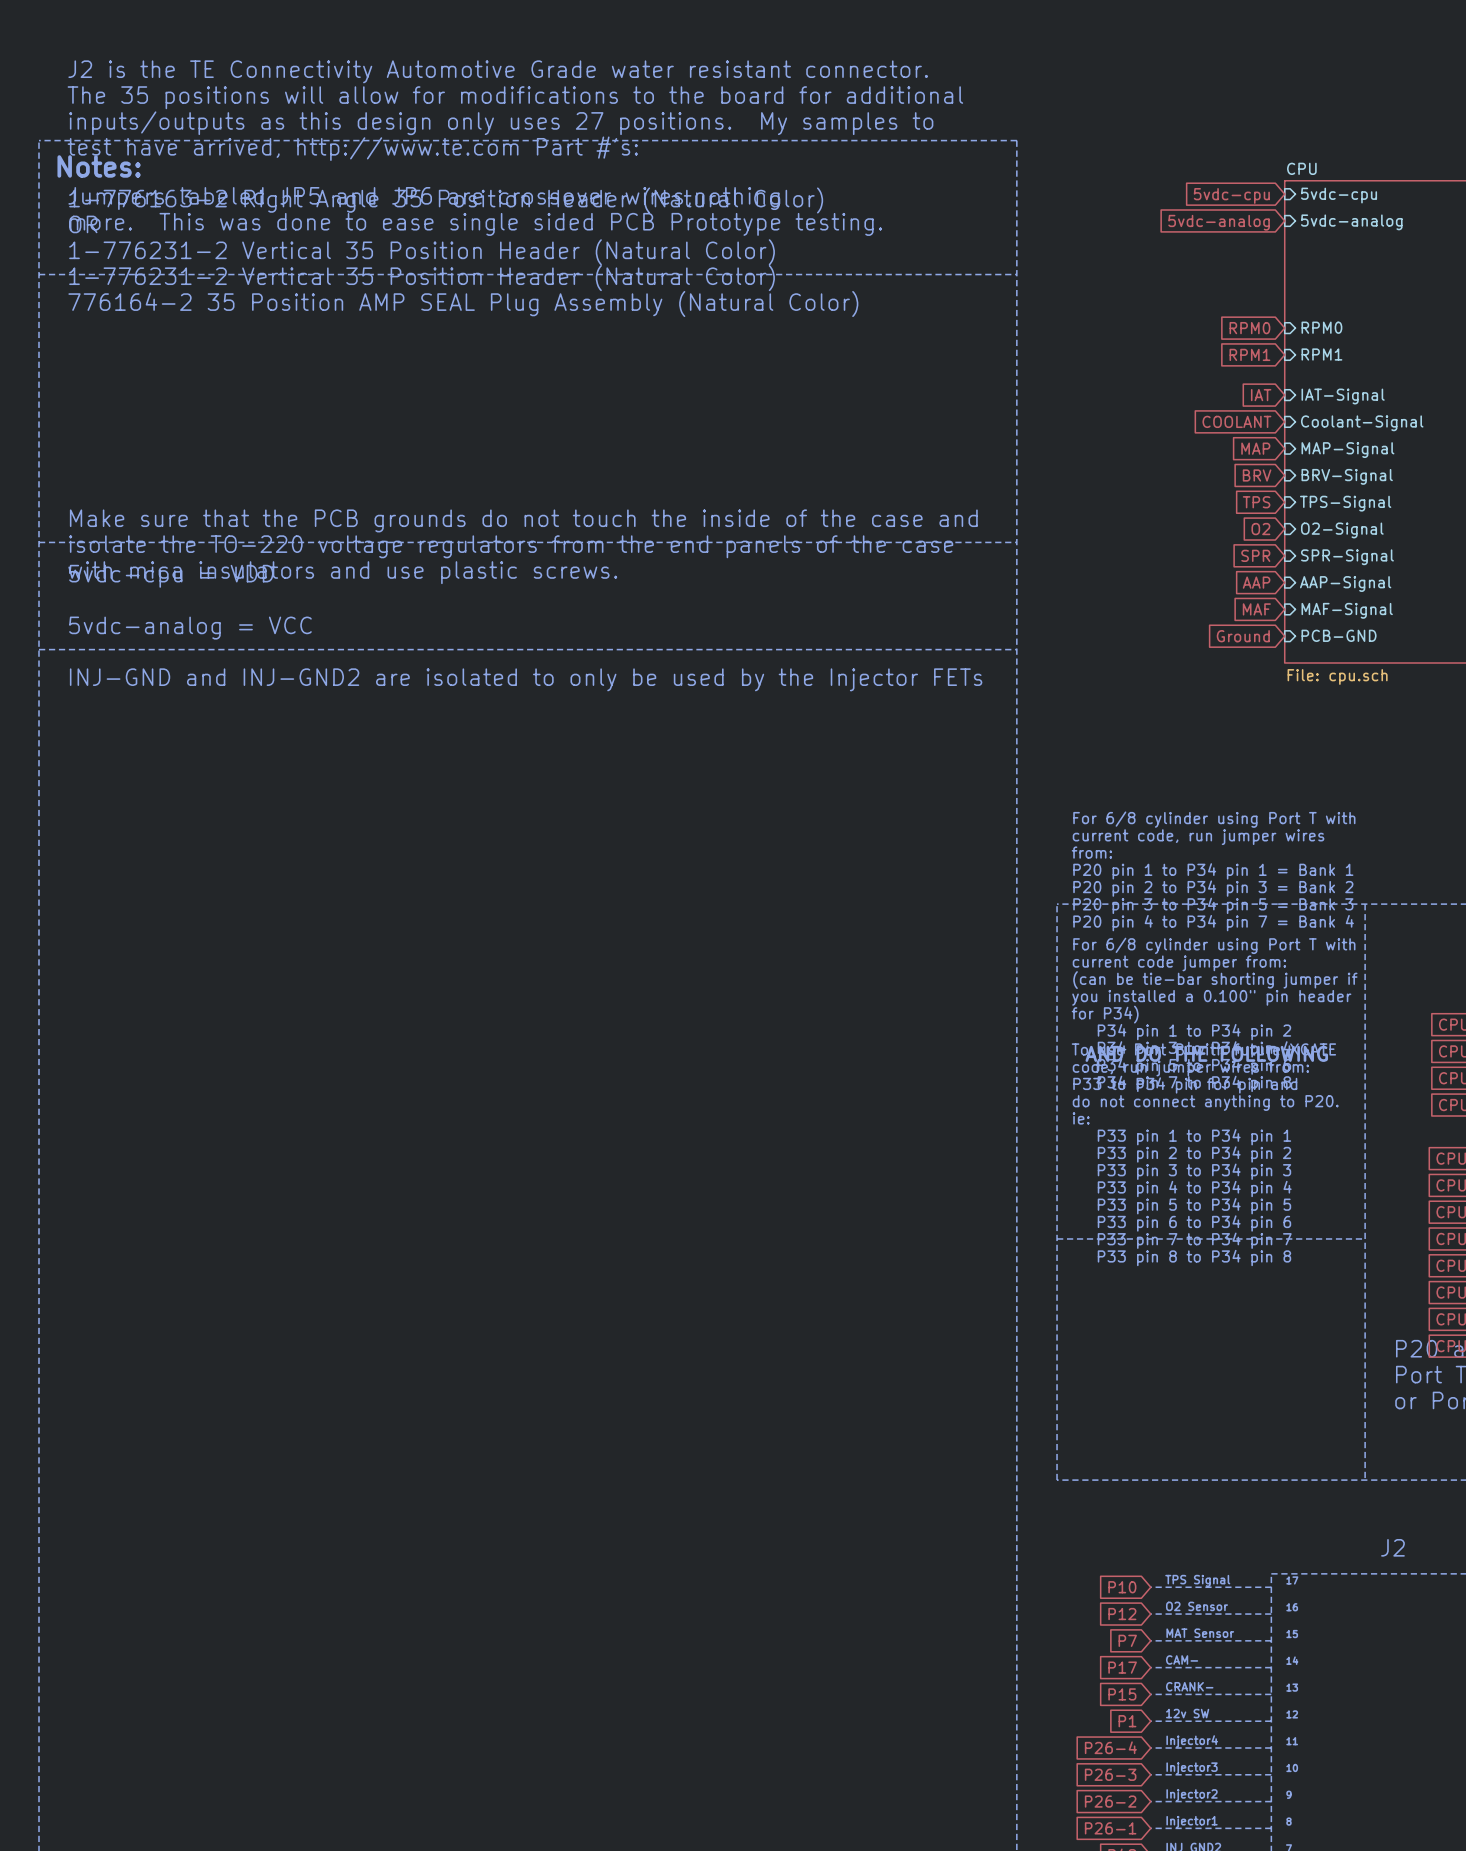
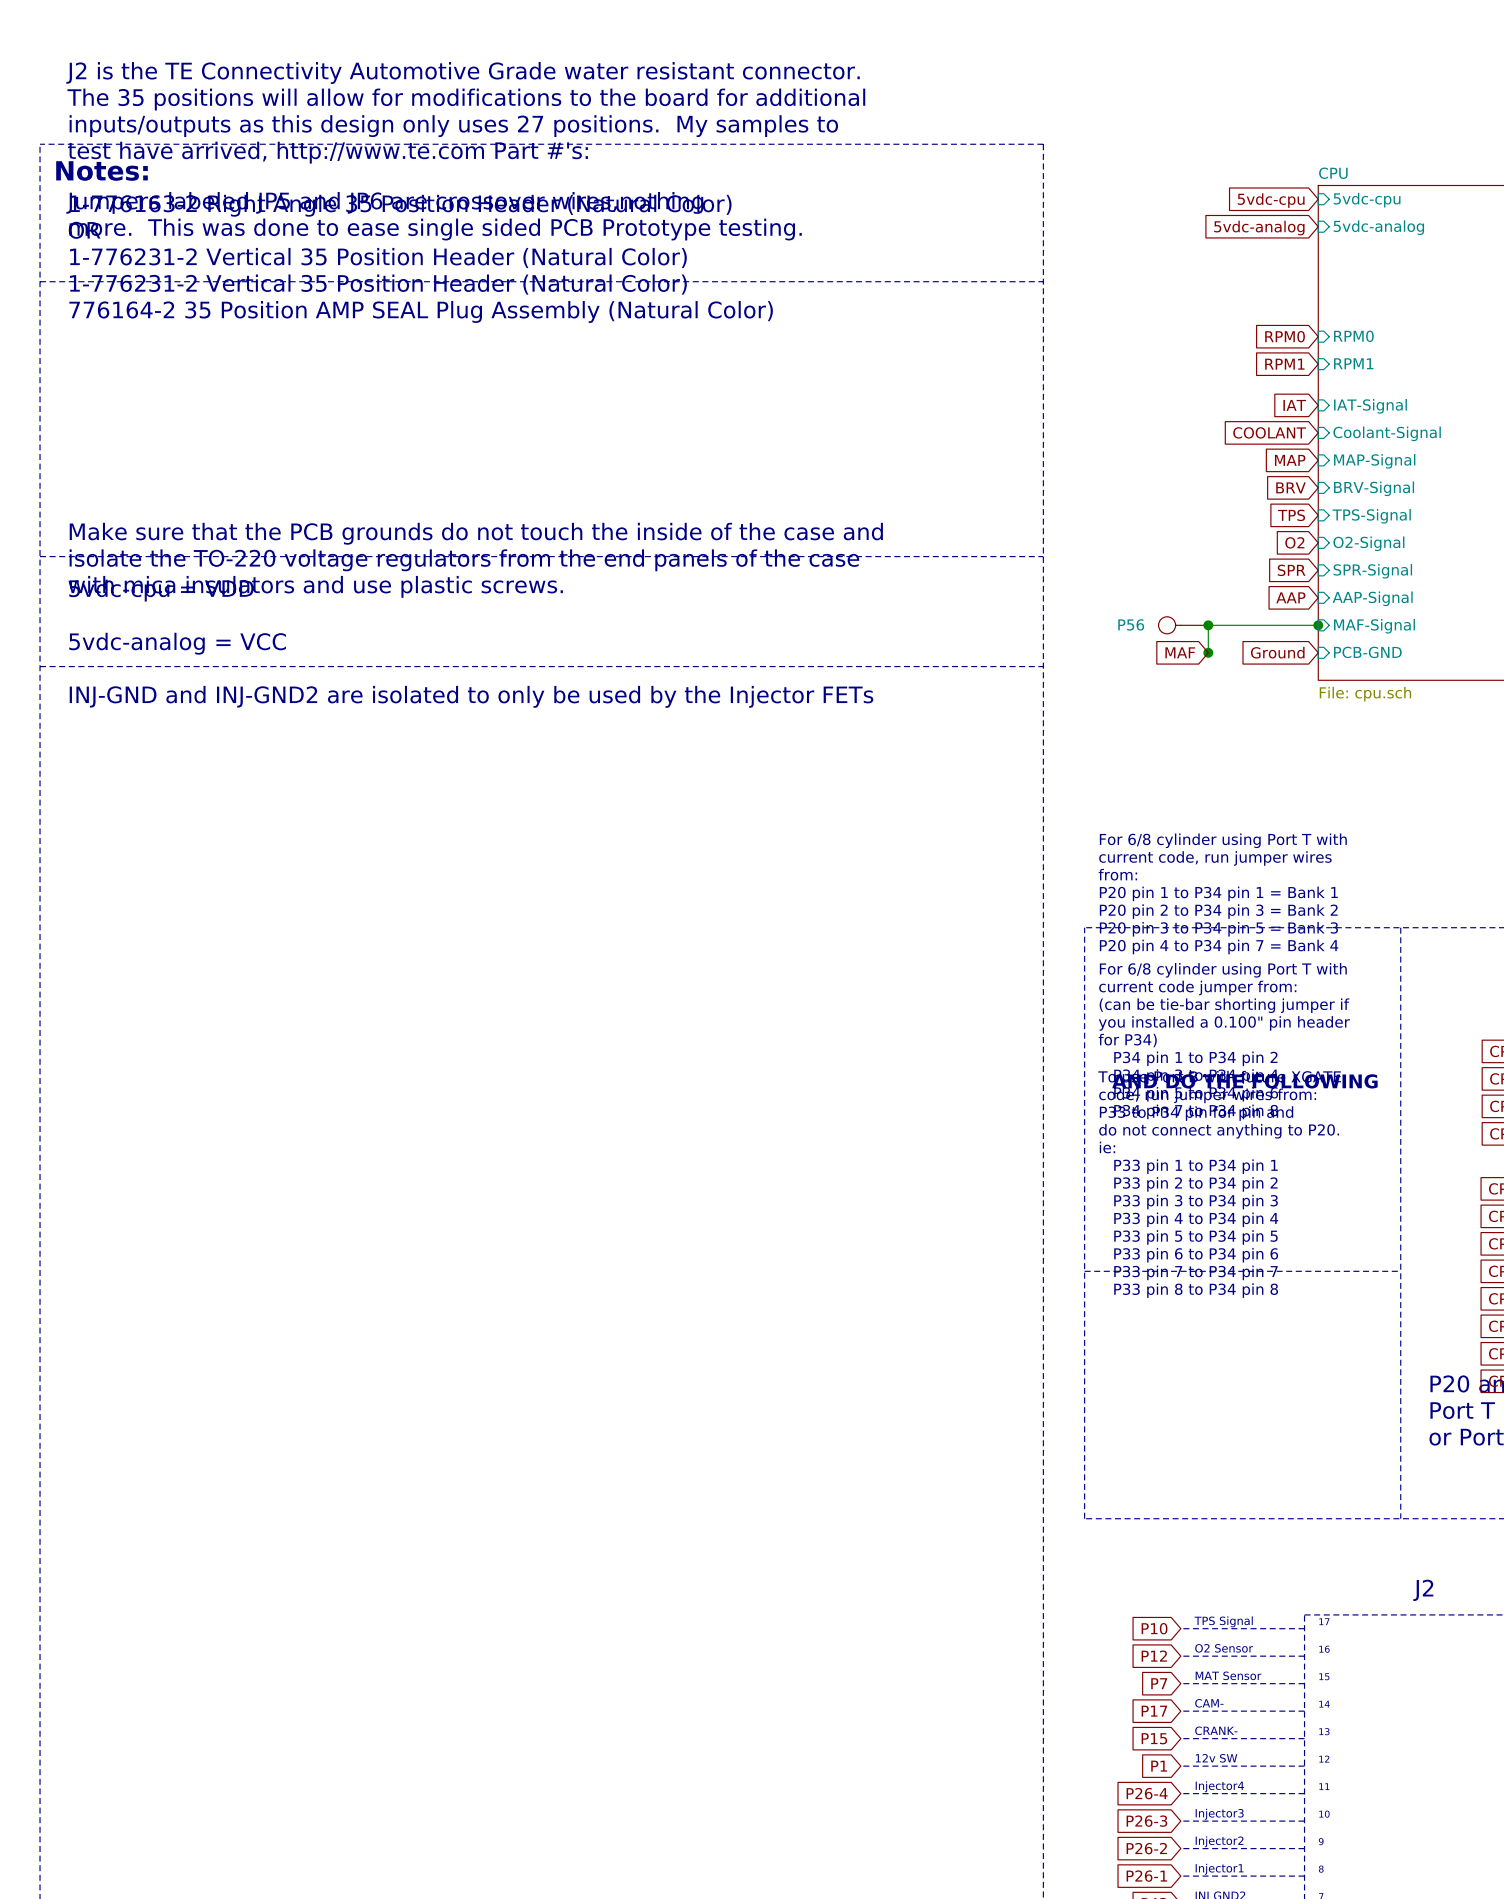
P56: none -> (1183, 625)
junction: none -> (1208, 625)
global label position: MAF (1256, 609) -> MAF (1180, 652)
wire: none -> (1318, 625) (1208, 625) (1208, 652)
junction: none -> (1318, 625)
junction: none -> (1208, 652)

